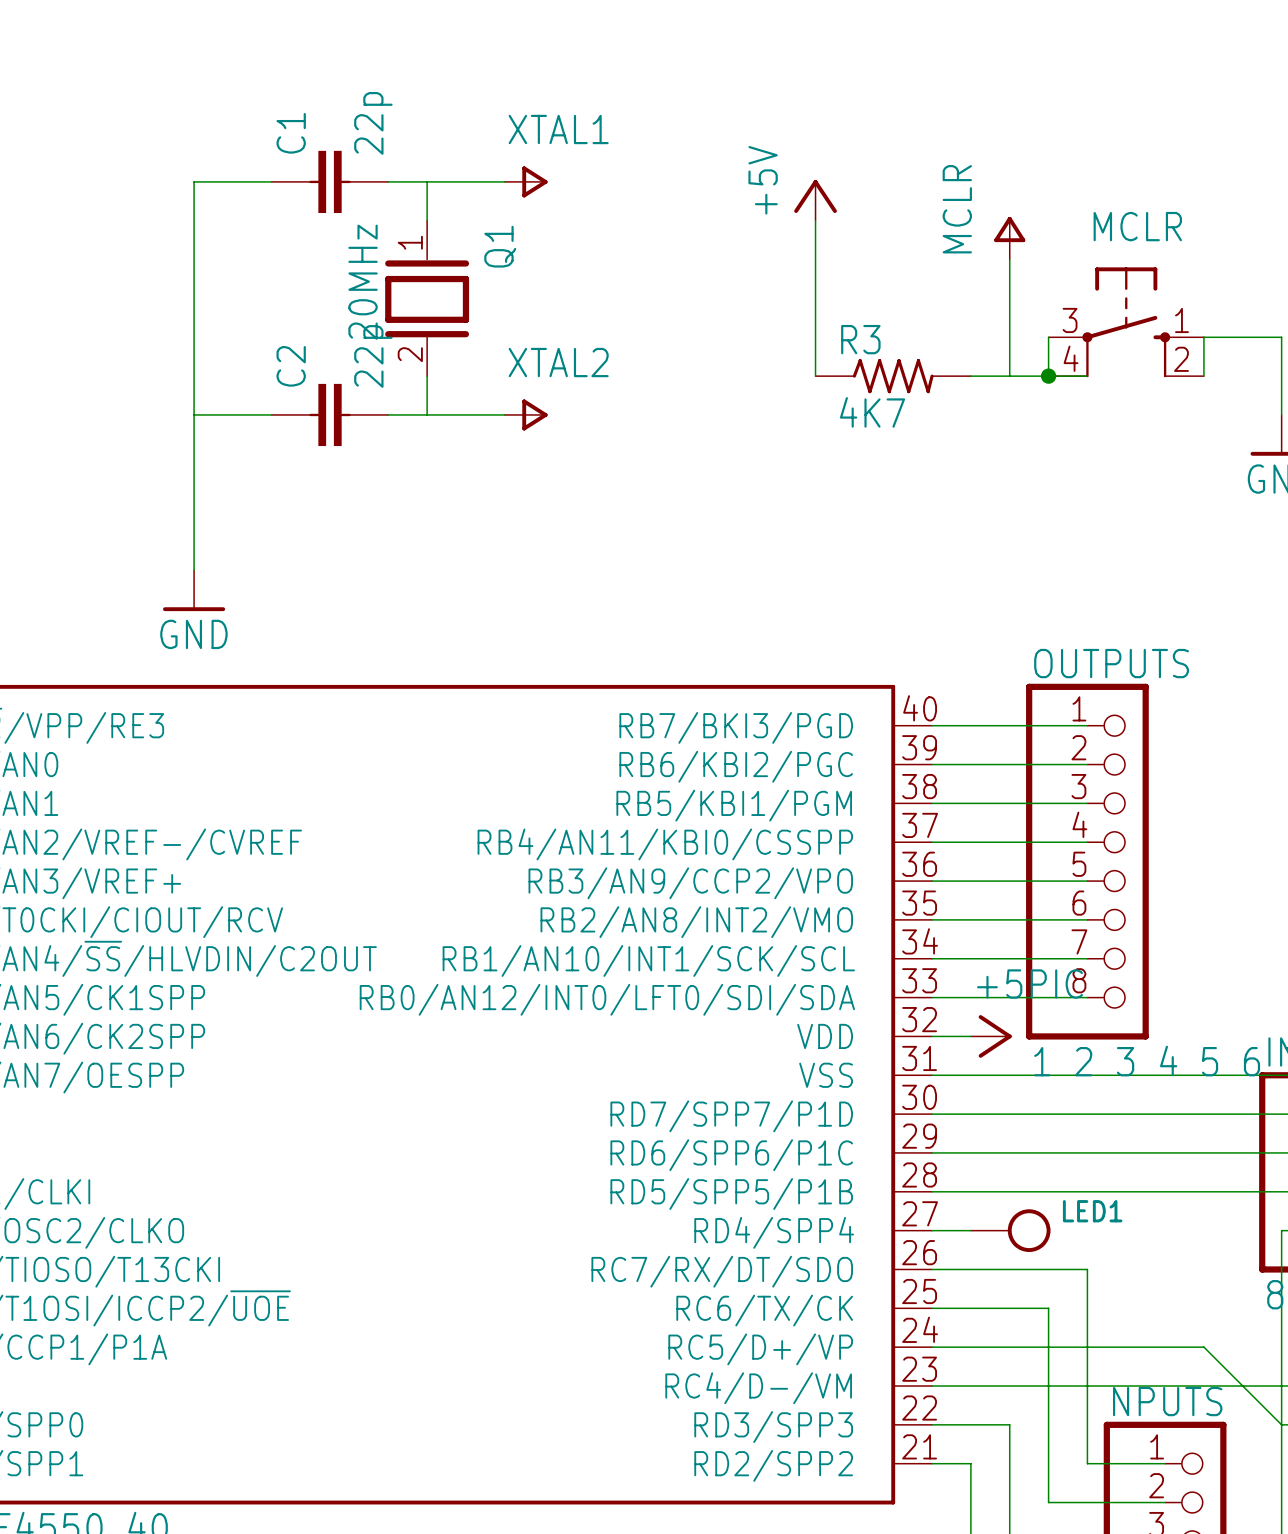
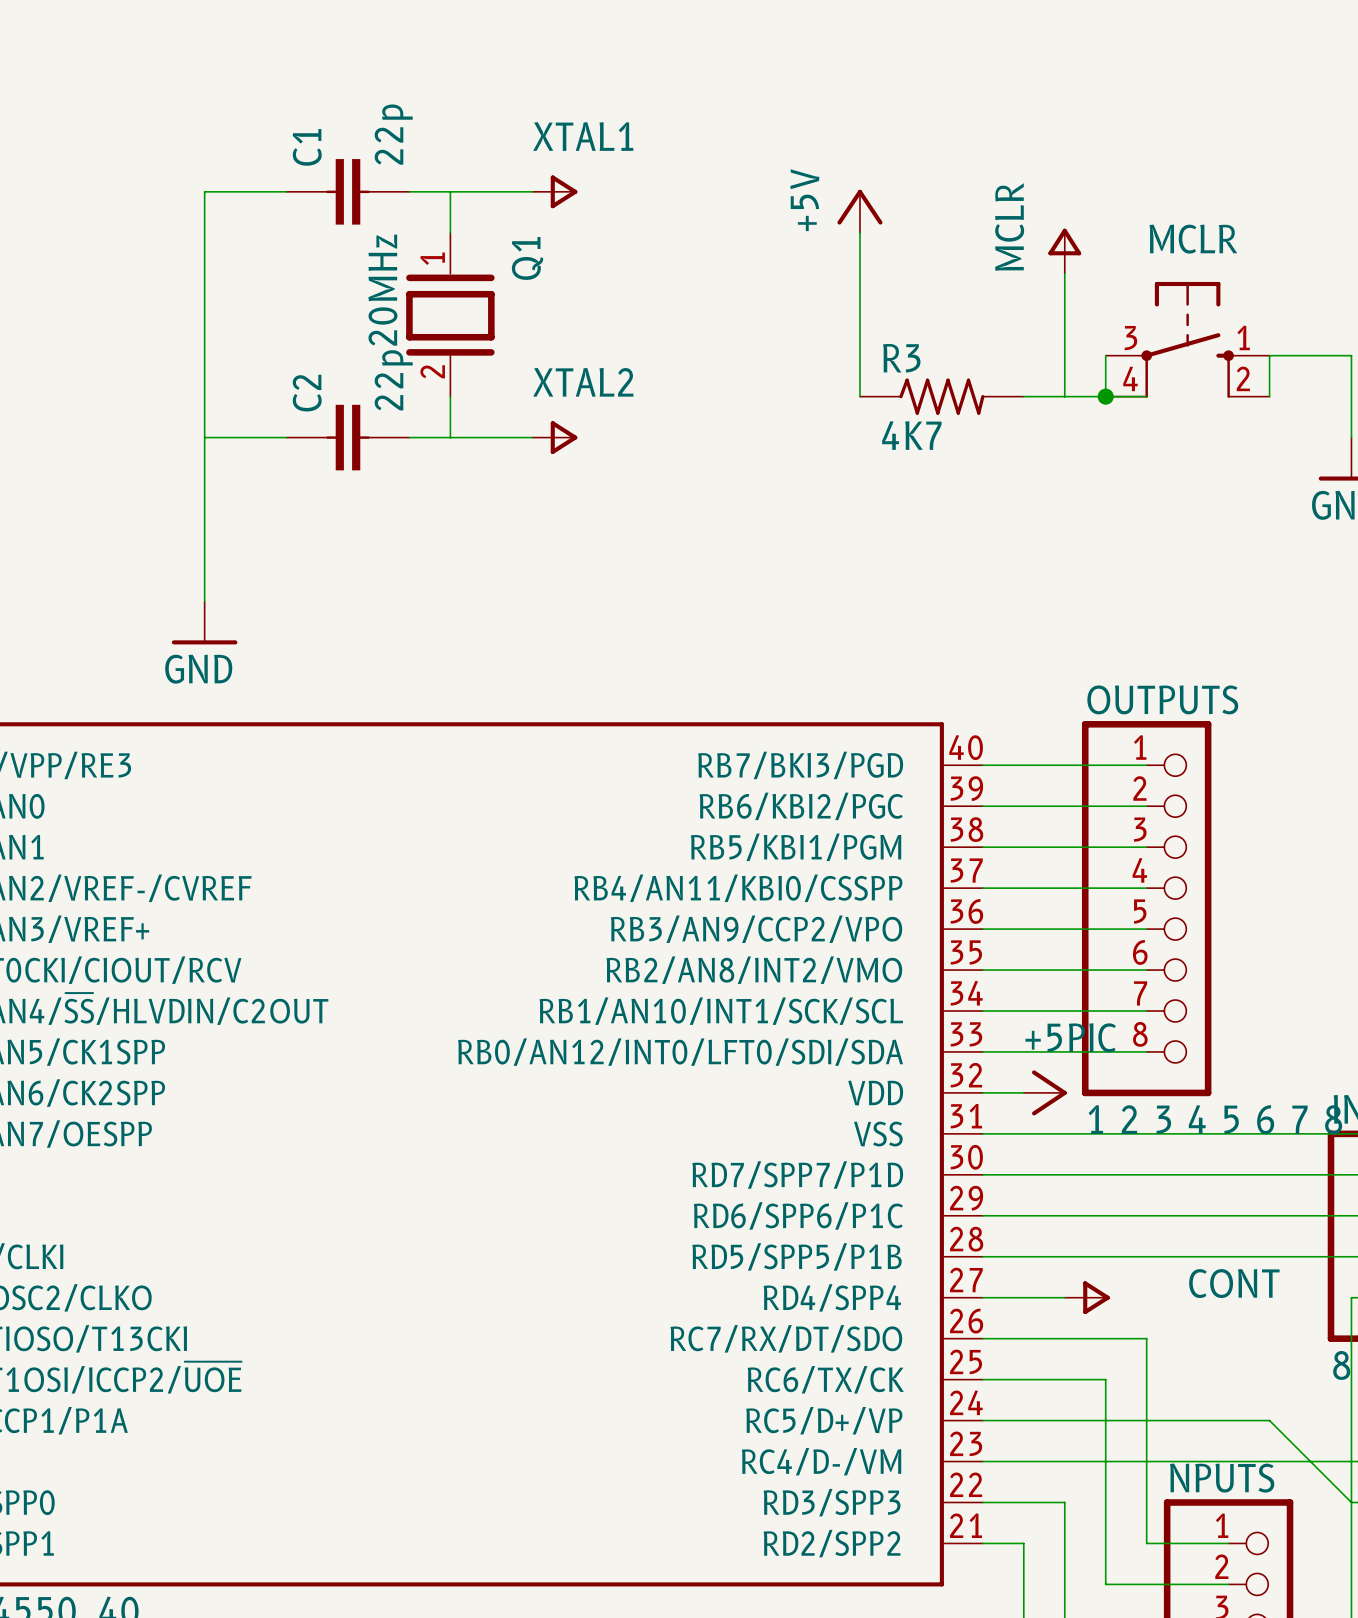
power symbol: LED1 (1010, 1230) -> none
power symbol: none -> CONT (1087, 1297)

